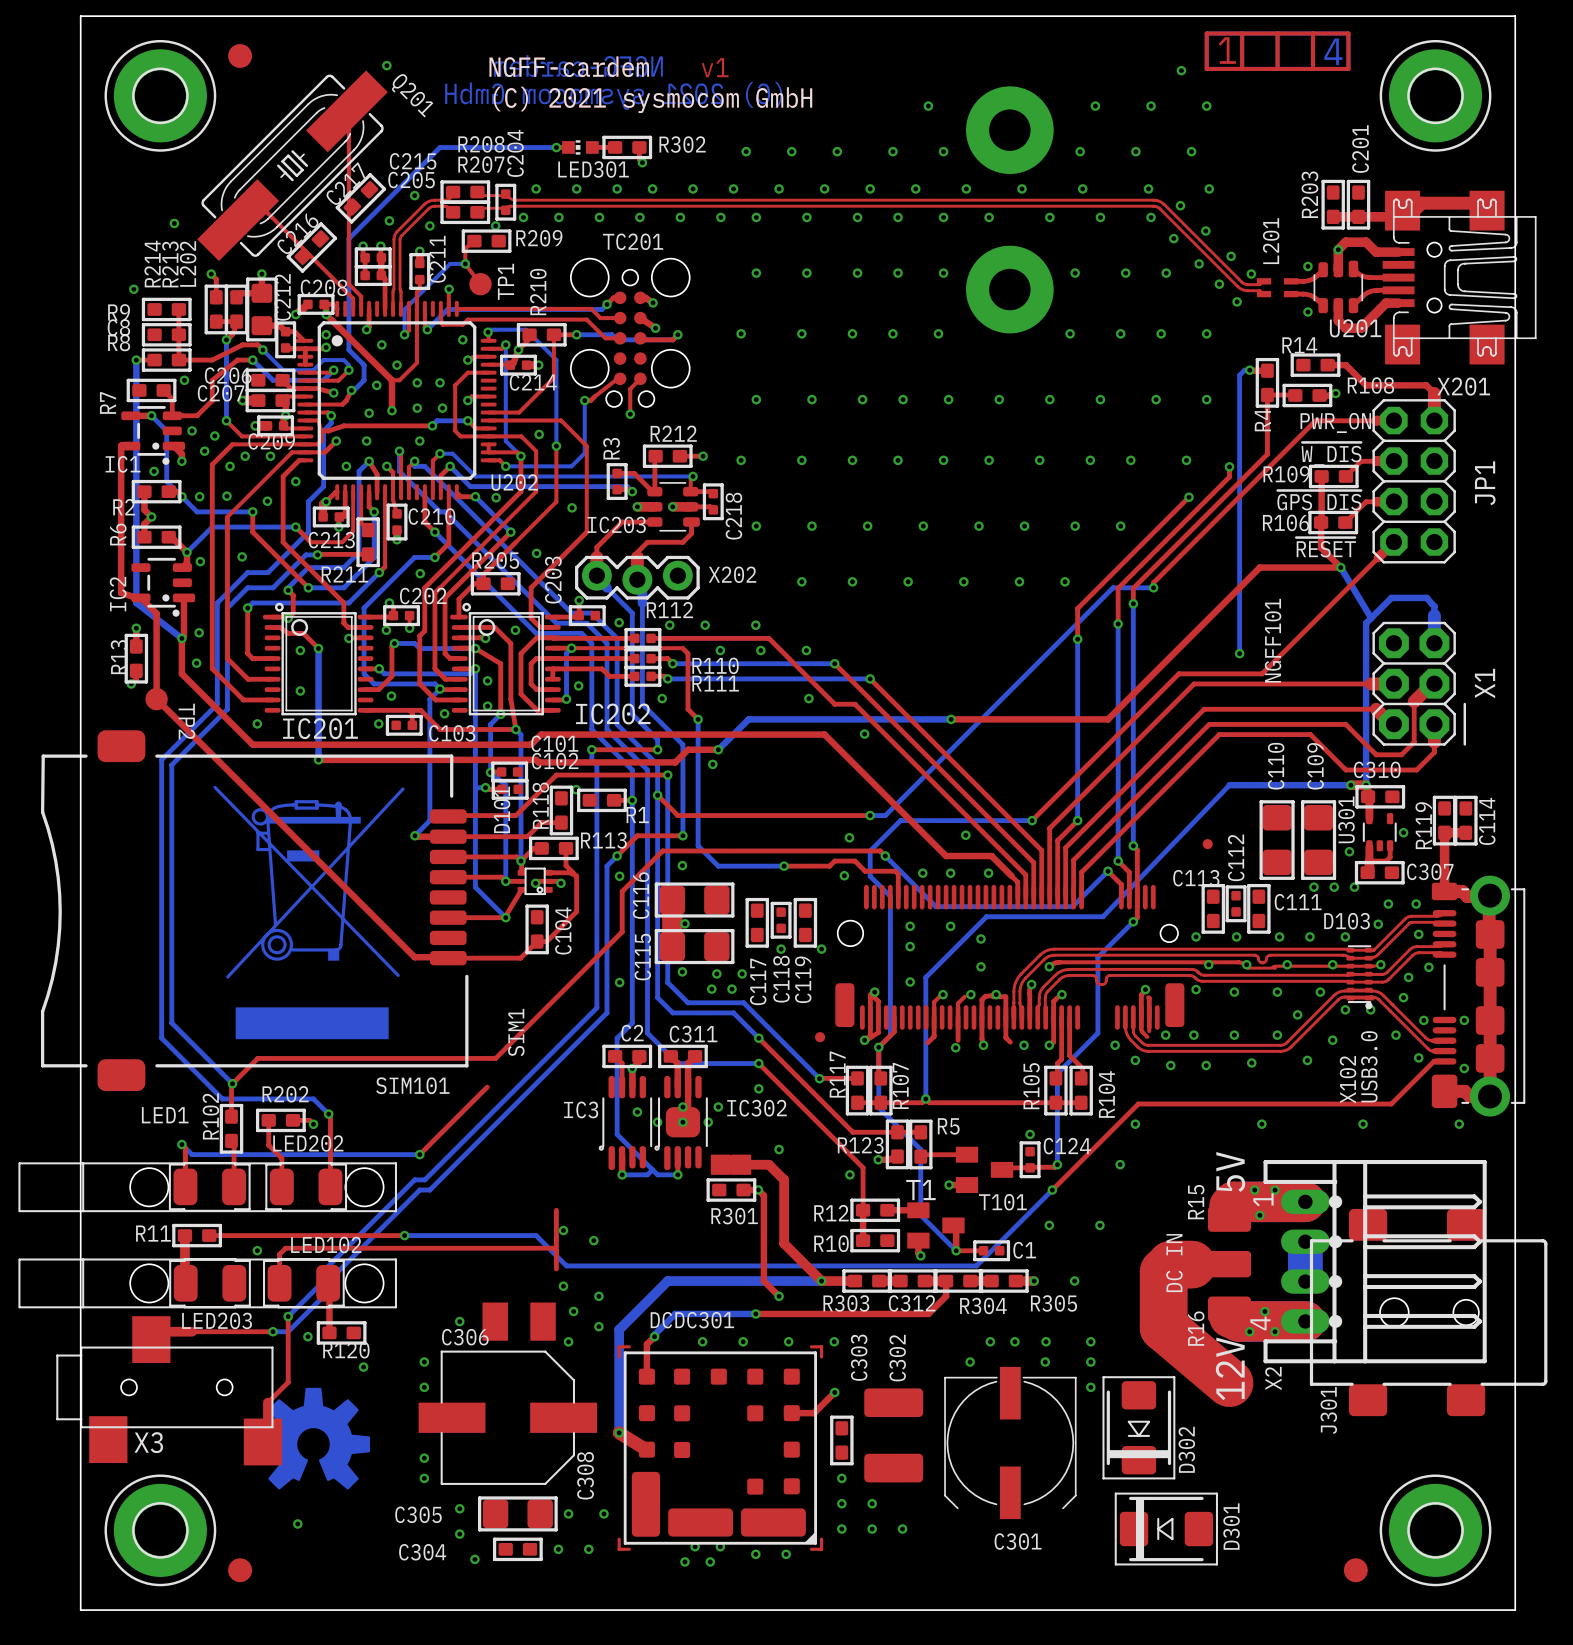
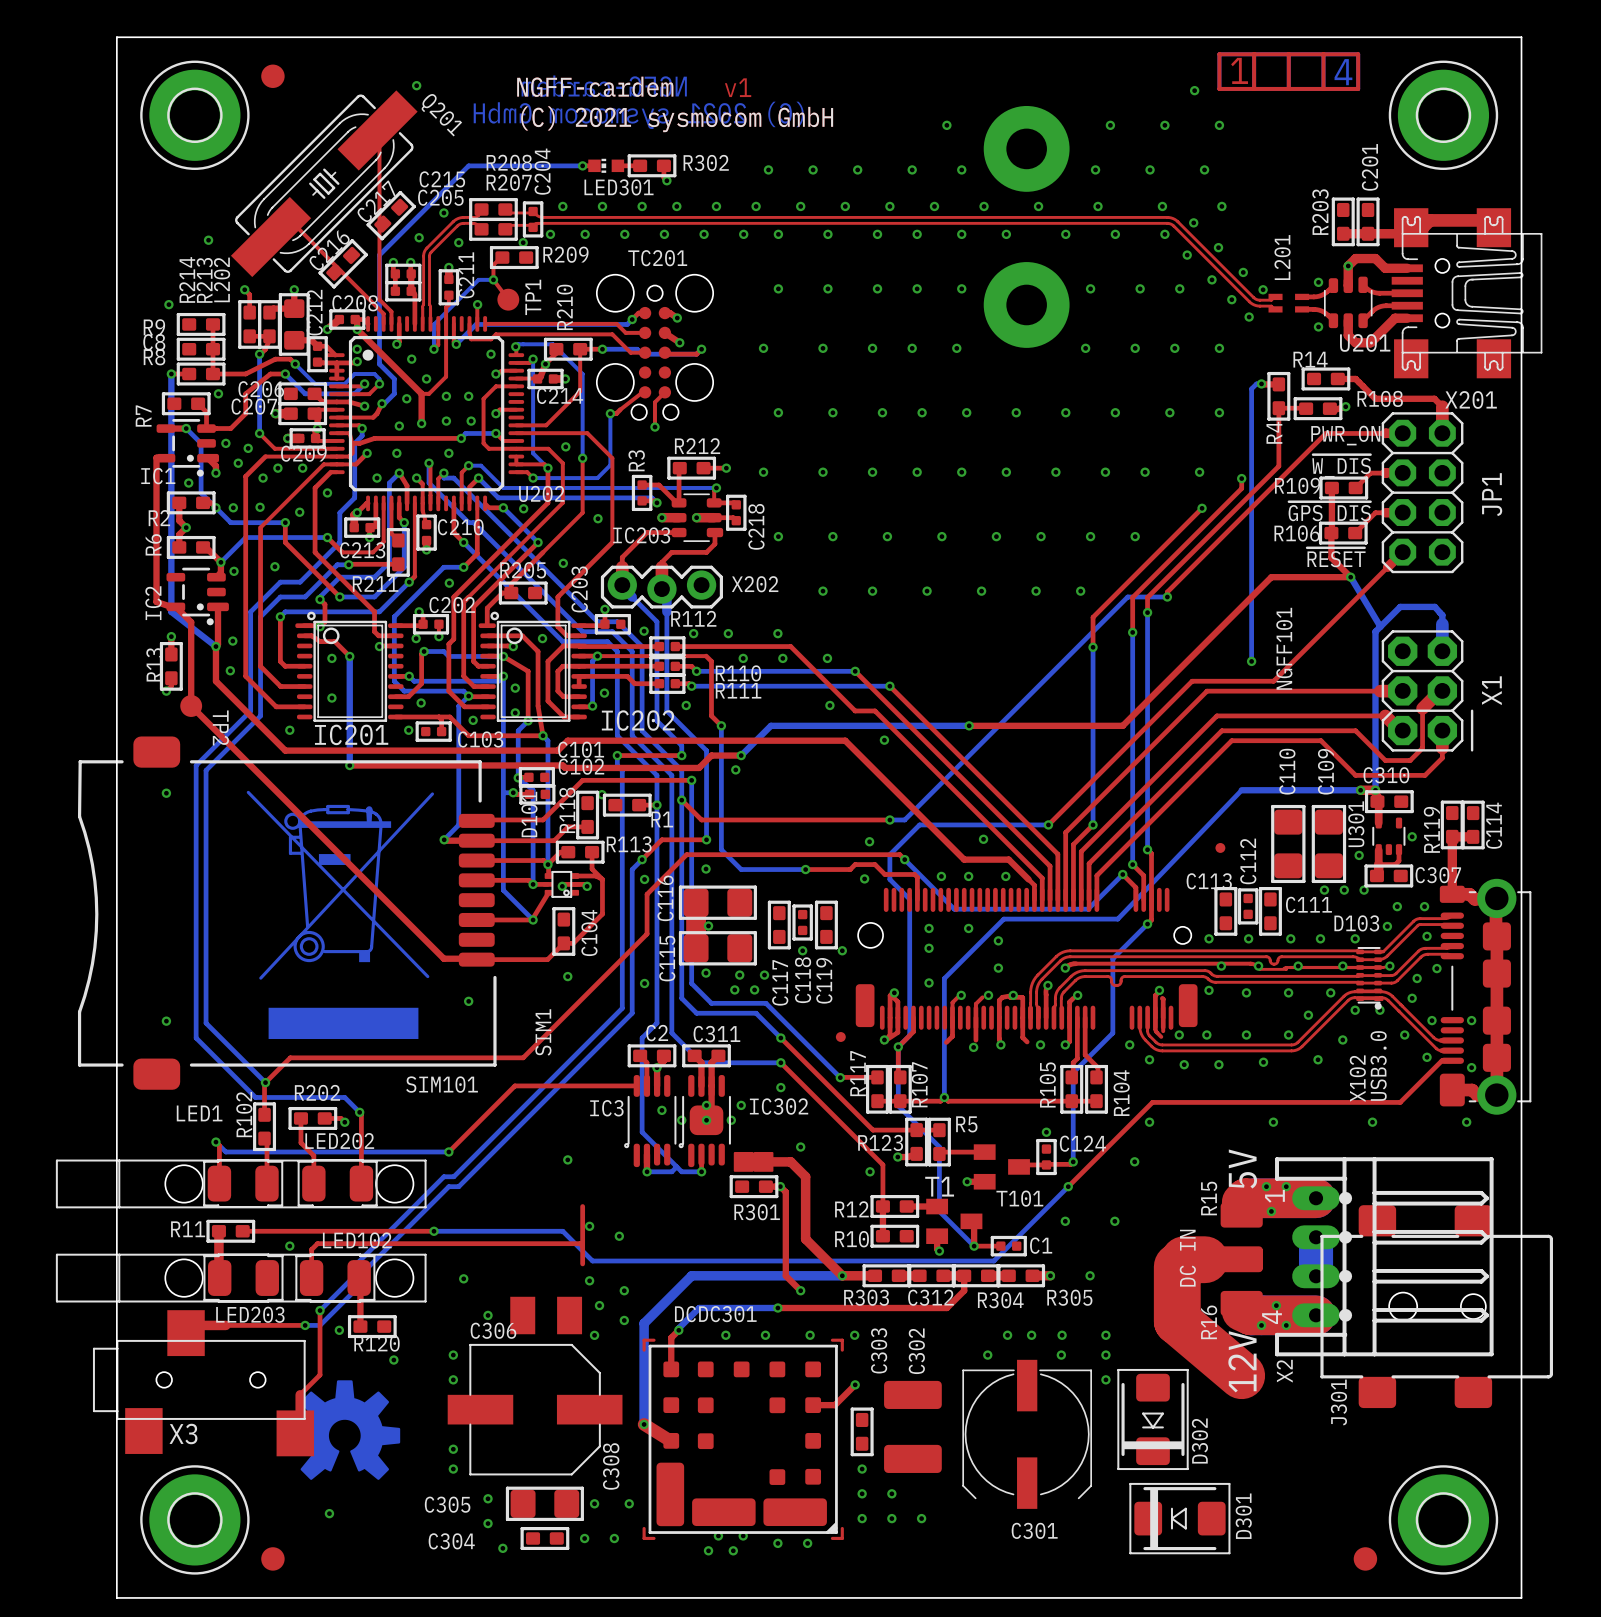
via: none -> (166, 793)
via: none -> (567, 976)
via: none -> (468, 1001)
via: none -> (166, 1021)
top track: none -> (514, 1085) (636, 1085)
via: none -> (567, 1159)
via: none -> (463, 1278)

